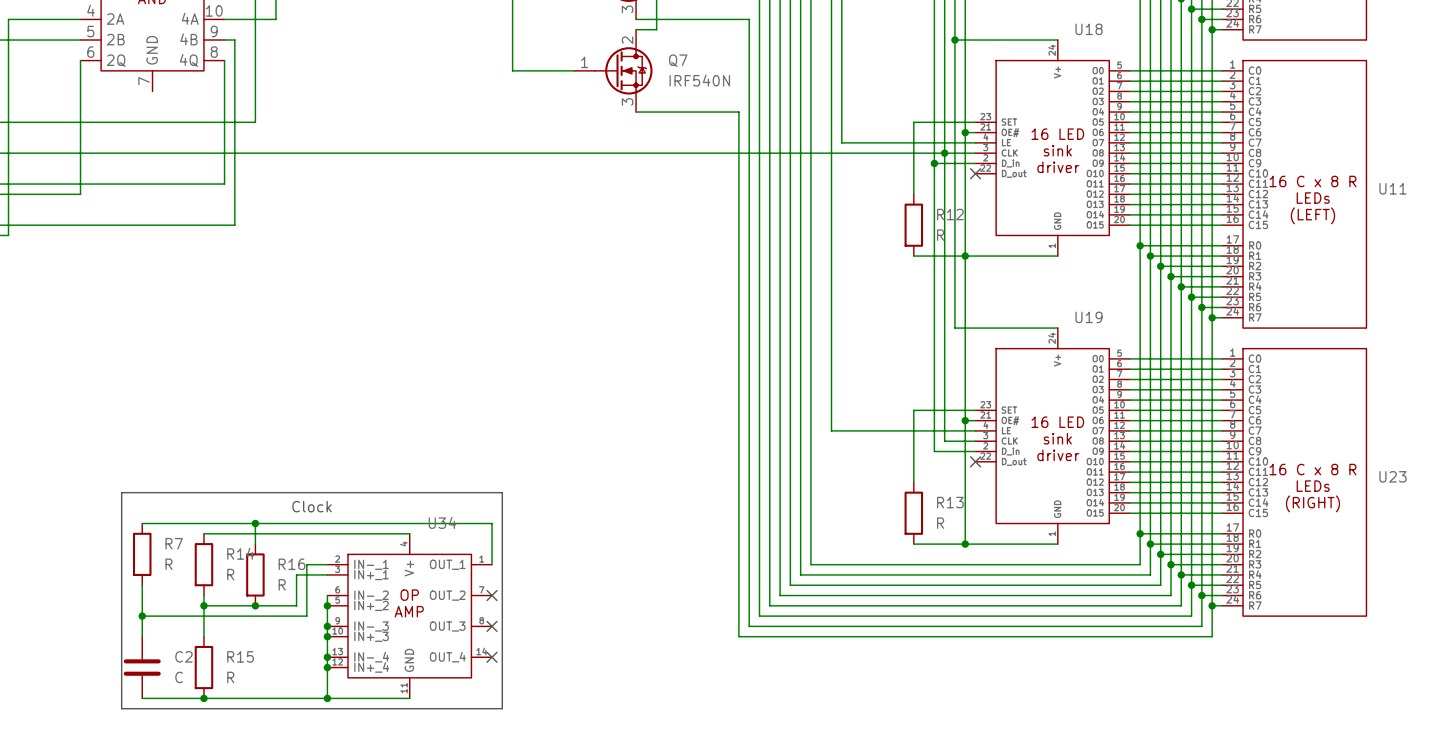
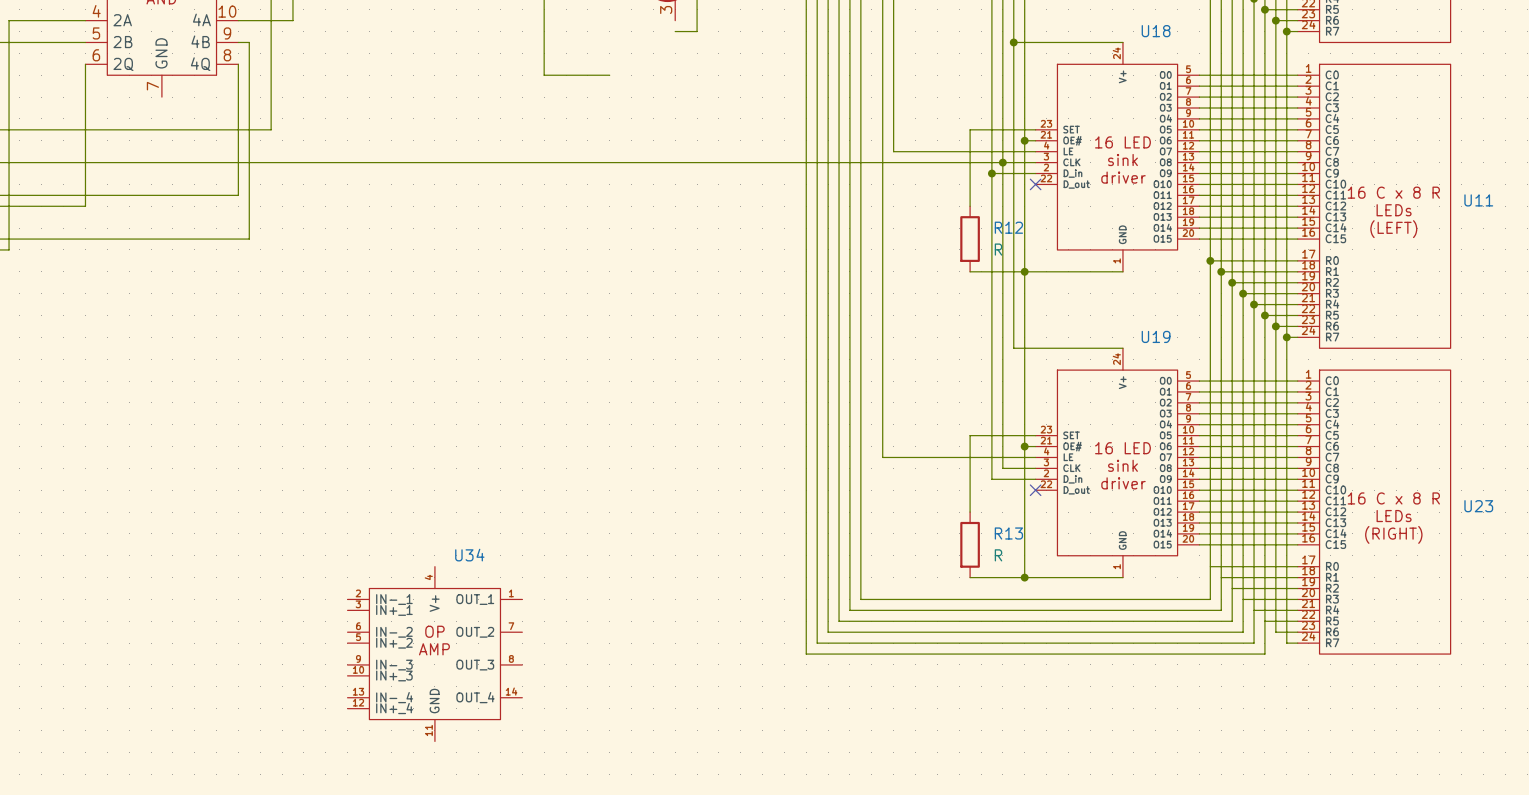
wire: (636, 19) (749, 19) (749, 626) (1201, 626) (1201, 595) -> none
Q7: IRF540N (613, 70) -> none
wire: (636, 112) (738, 112) (738, 636) (1212, 636) (1212, 605) -> none
line: (121, 492) (502, 492) (502, 708) (121, 708) (121, 492) -> none
text: Clock (311, 506) -> none
wire: (142, 523) (492, 523) (492, 564) -> none
wire: (255, 523) (255, 544) -> none
junction: (255, 523) -> none
wire: (203, 533) (409, 533) -> none
junction: (1140, 533) -> none
junction: (1150, 544) -> none
R7: R (142, 554) -> none
junction: (1160, 554) -> none
R14: R (203, 564) -> none
wire: (327, 564) (306, 564) (306, 616) (142, 616) -> none
junction: (1170, 564) -> none
R16: R (255, 574) -> none
wire: (327, 574) (296, 574) (296, 605) (203, 605) -> none
junction: (1181, 574) -> none
wire: (142, 585) (142, 636) -> none
junction: (1191, 585) -> none
wire: (203, 595) (203, 636) -> none
wire: (327, 595) (327, 698) -> none
no-connect mark: (492, 595) -> none
junction: (1201, 595) -> none
junction: (203, 605) -> none
junction: (255, 605) -> none
junction: (327, 605) -> none
junction: (1212, 605) -> none
junction: (142, 616) -> none
junction: (327, 626) -> none
no-connect mark: (492, 626) -> none
junction: (327, 636) -> none
junction: (327, 657) -> none
no-connect mark: (492, 657) -> none
C2: C (142, 667) -> none
R15: R (203, 667) -> none
junction: (327, 667) -> none
wire: (142, 698) (409, 698) -> none
junction: (203, 698) -> none
junction: (327, 698) -> none

